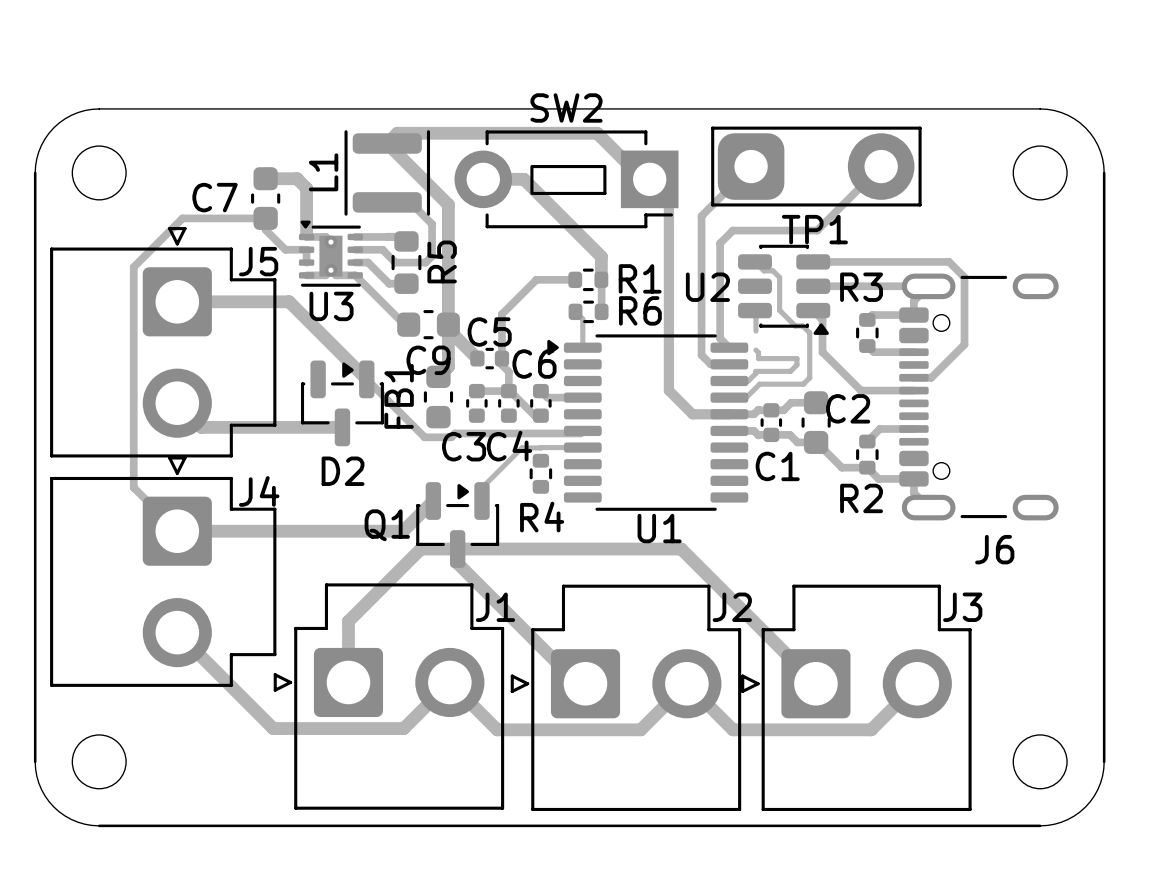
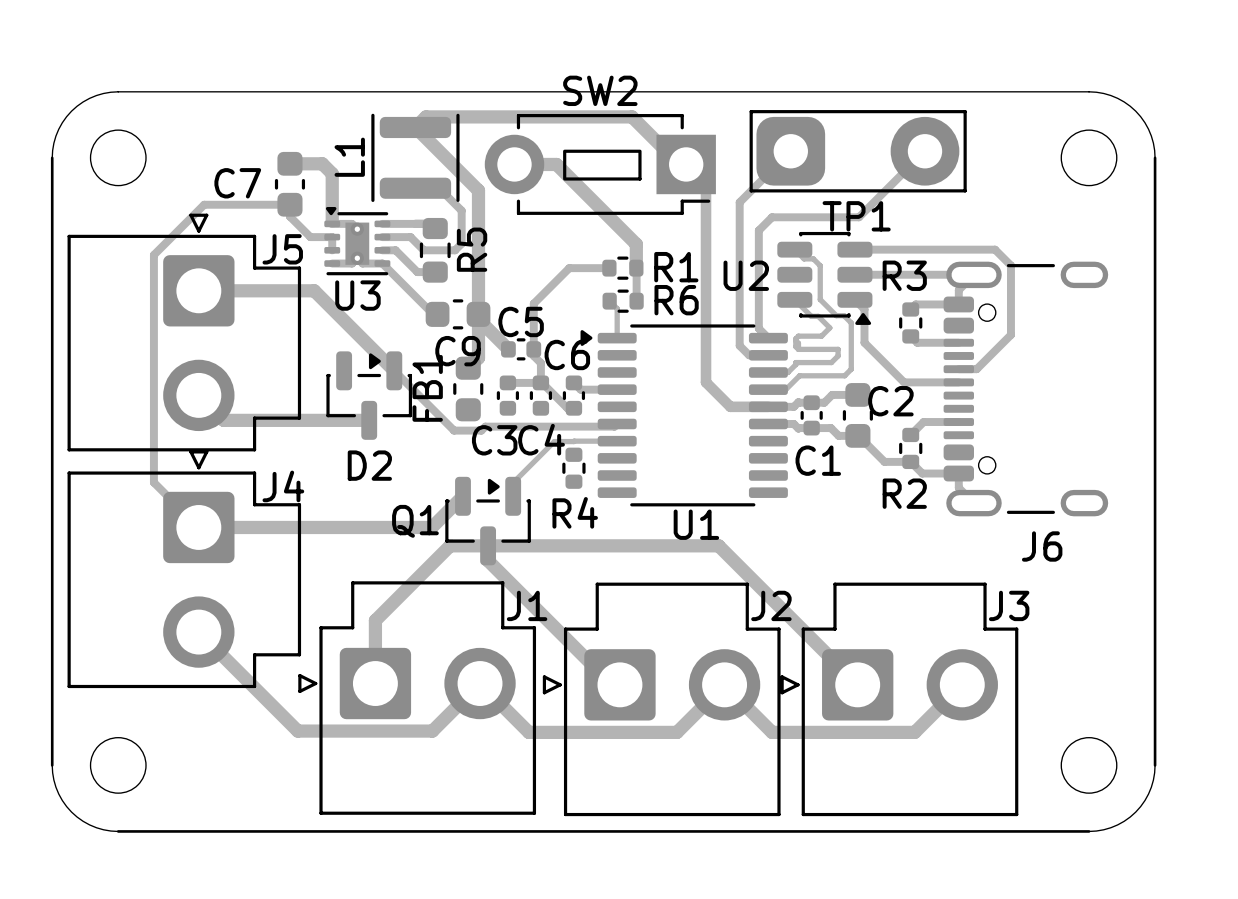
track: (755, 311) (755, 331) -> (795, 300) (811, 316) (818, 316) (829, 327) (821, 336) (798, 336) (795, 338) (795, 346) (798, 349)

